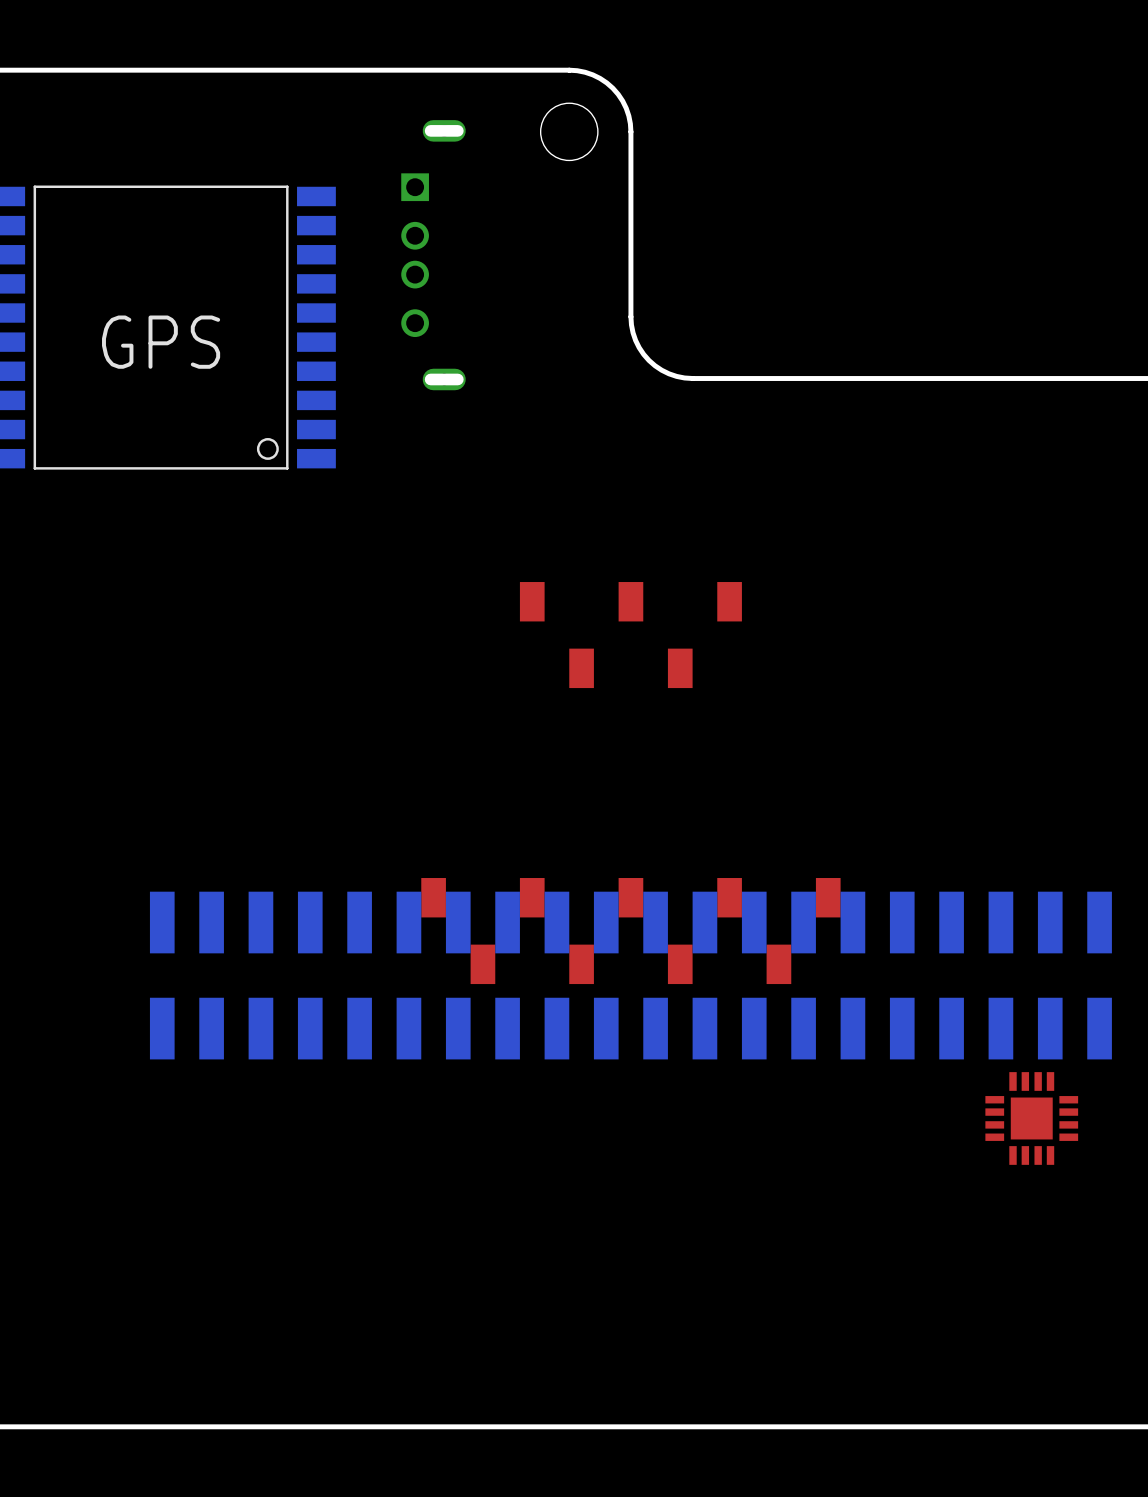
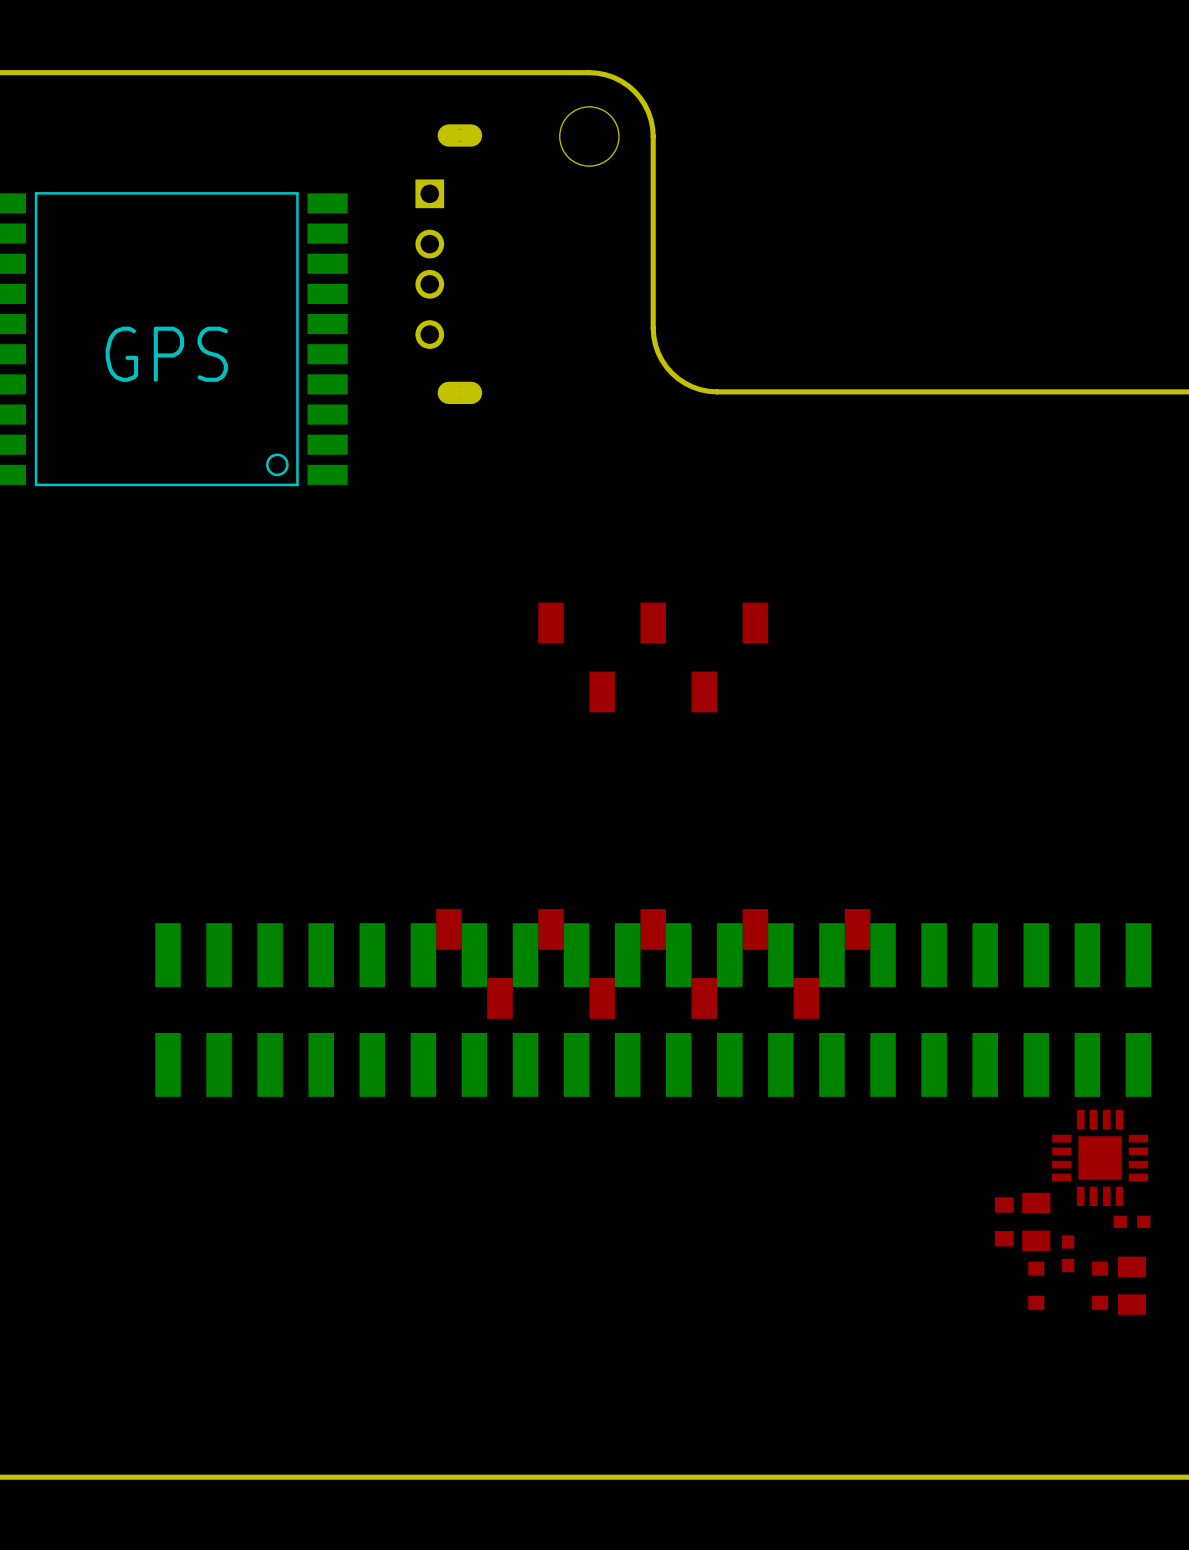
part position: (1031, 1118) -> (1100, 1157)
part: none -> (1004, 1221)
part: none -> (1036, 1221)
part: none -> (1132, 1221)
part: none -> (1068, 1253)
part: none -> (1036, 1285)
part: none -> (1100, 1285)
part: none -> (1132, 1285)

